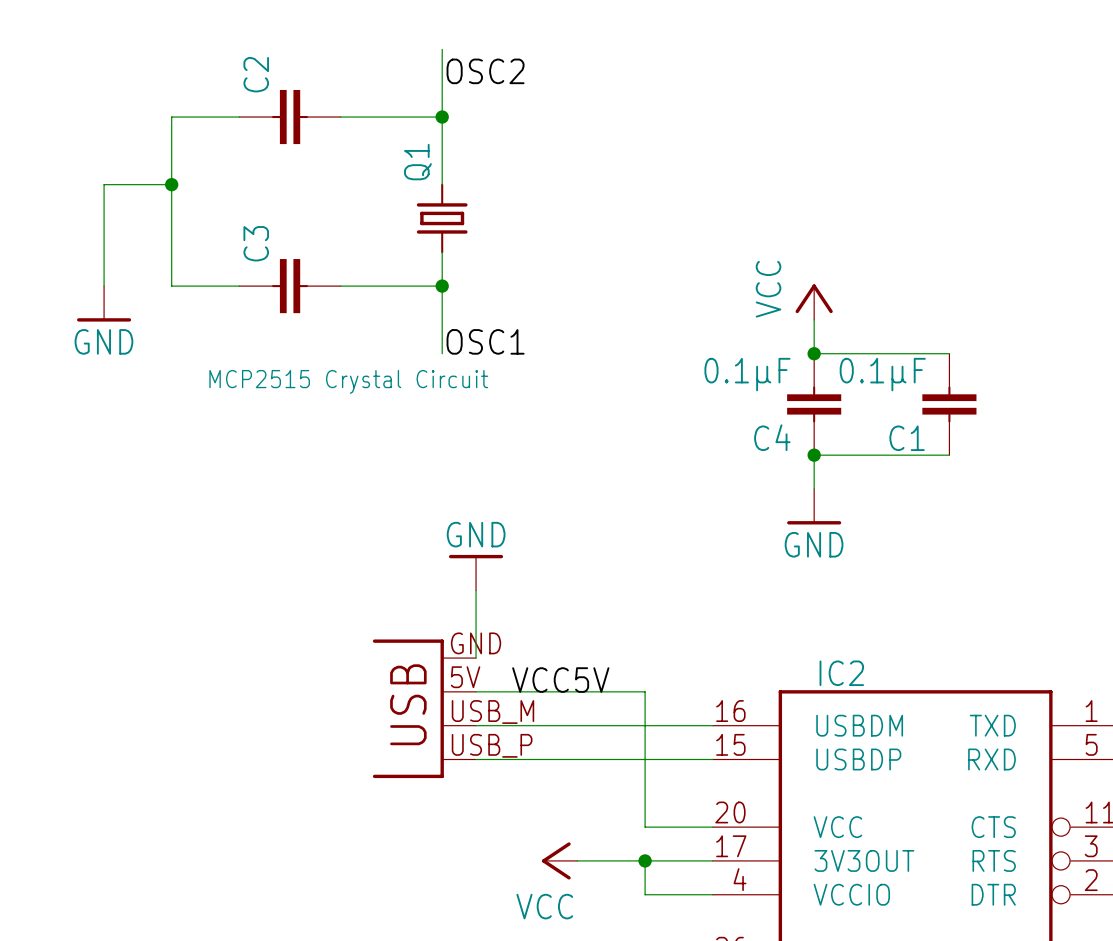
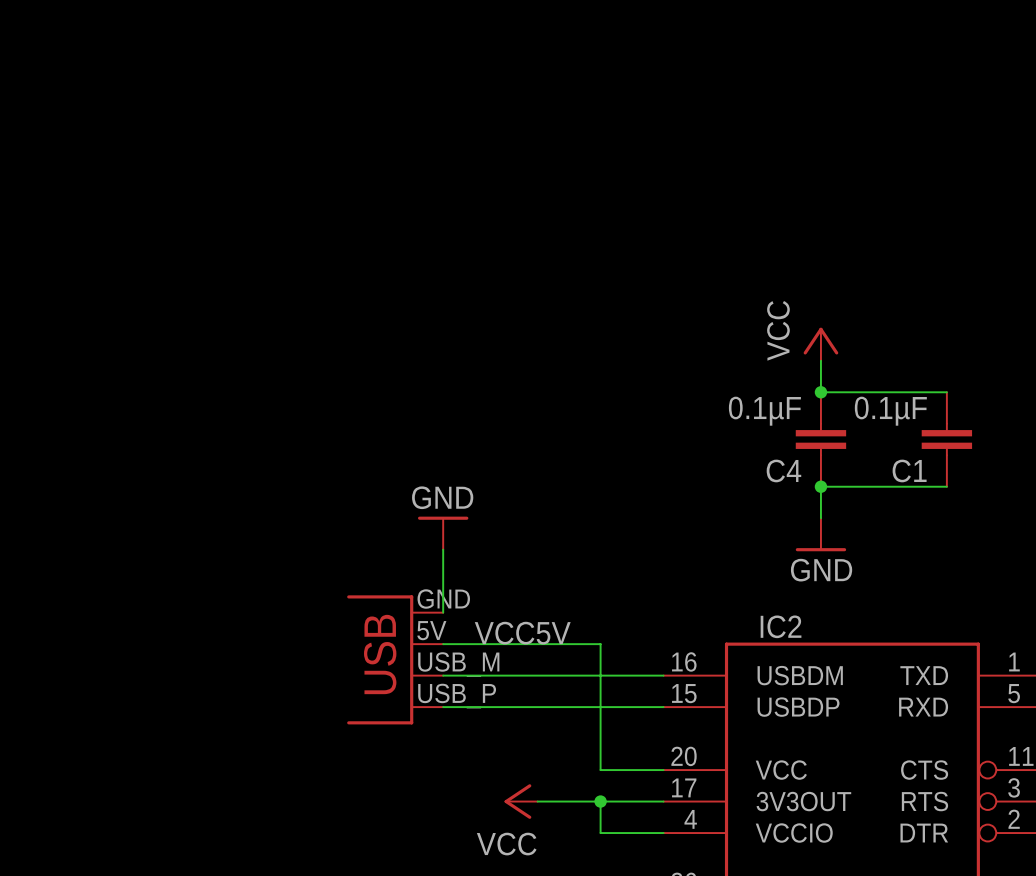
wire: (442, 49) (442, 184) -> none
label: OSC2 (485, 71) -> none
wire: (239, 117) (171, 117) (171, 286) (239, 286) -> none
C2: (290, 117) -> none
wire: (340, 117) (442, 117) -> none
junction: (442, 117) -> none
wire: (171, 184) (104, 184) (104, 286) -> none
junction: (171, 184) -> none
Q1: (442, 218) -> none
wire: (442, 252) (442, 353) -> none
C3: (290, 286) -> none
wire: (340, 286) (442, 286) -> none
junction: (442, 286) -> none
power symbol position: VCC (814, 302) -> VCC (820, 344)
power symbol: GND (104, 303) -> none
wire: (814, 319) (814, 353) (949, 353) -> (820, 360) (820, 392) (946, 392)
label: OSC1 (485, 341) -> none
junction: (814, 353) -> none
text: MCP2515 Crystal Circuit (348, 381) -> none
C4 position: (814, 404) -> (820, 439)
C1 position: (949, 404) -> (946, 439)
junction: none -> (820, 392)
junction: (814, 455) -> none
wire: (949, 455) (814, 455) (814, 488) -> (946, 486) (820, 486) (820, 518)
power symbol position: GND (814, 506) -> GND (820, 534)
junction: none -> (820, 486)

